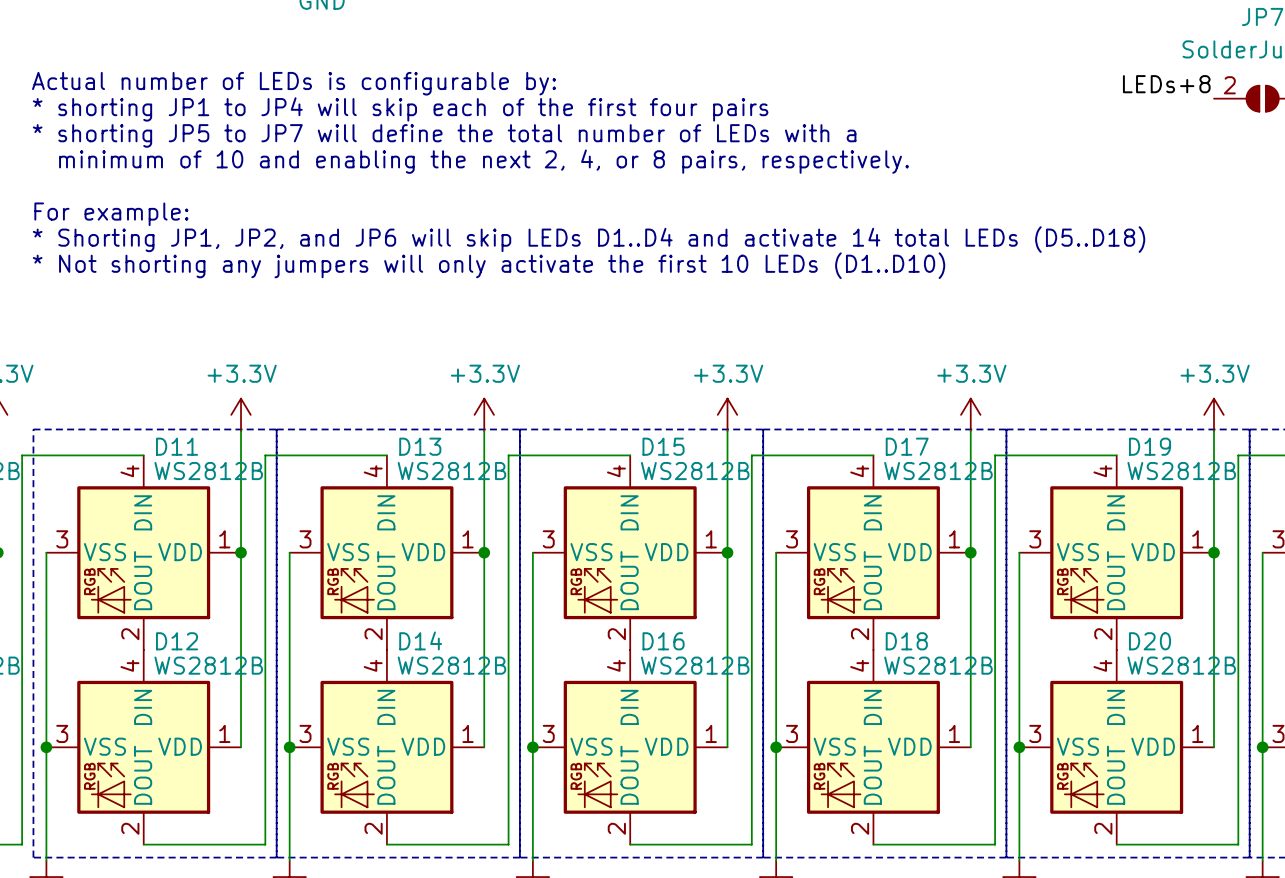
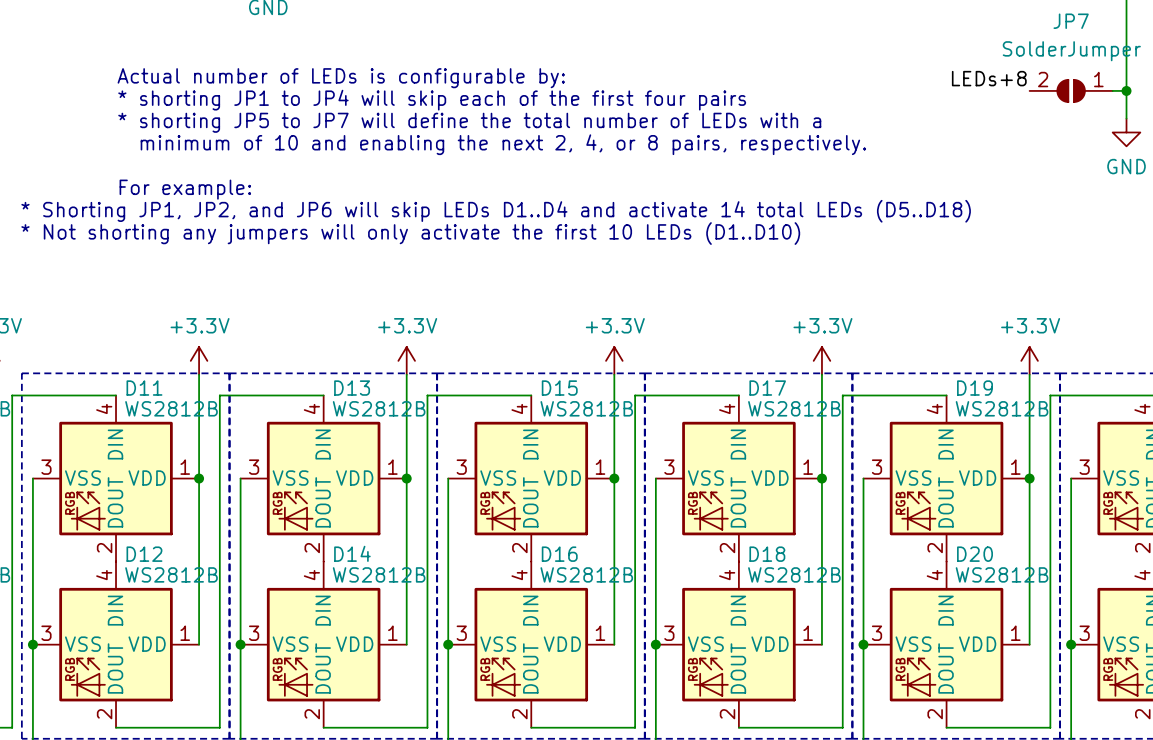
text position: Actual number of LEDs is configurable by: (294, 83) -> Actual number of LEDs is configurable by: (341, 78)
text position: * shorting JP1 to JP4 will skip each of the first four pairs (400, 109) -> * shorting JP1 to JP4 will skip each of the first four pairs (432, 100)
text position: * shorting JP5 to JP7 will define the total number of LEDs with a (444, 135) -> * shorting JP5 to JP7 will define the total number of LEDs with a (469, 122)
text position: minimum of 10 and enabling the next 2, 4, or 8 pairs, respectively. (483, 161) -> minimum of 10 and enabling the next 2, 4, or 8 pairs, respectively. (503, 144)
text position: For example: (111, 214) -> For example: (185, 189)

